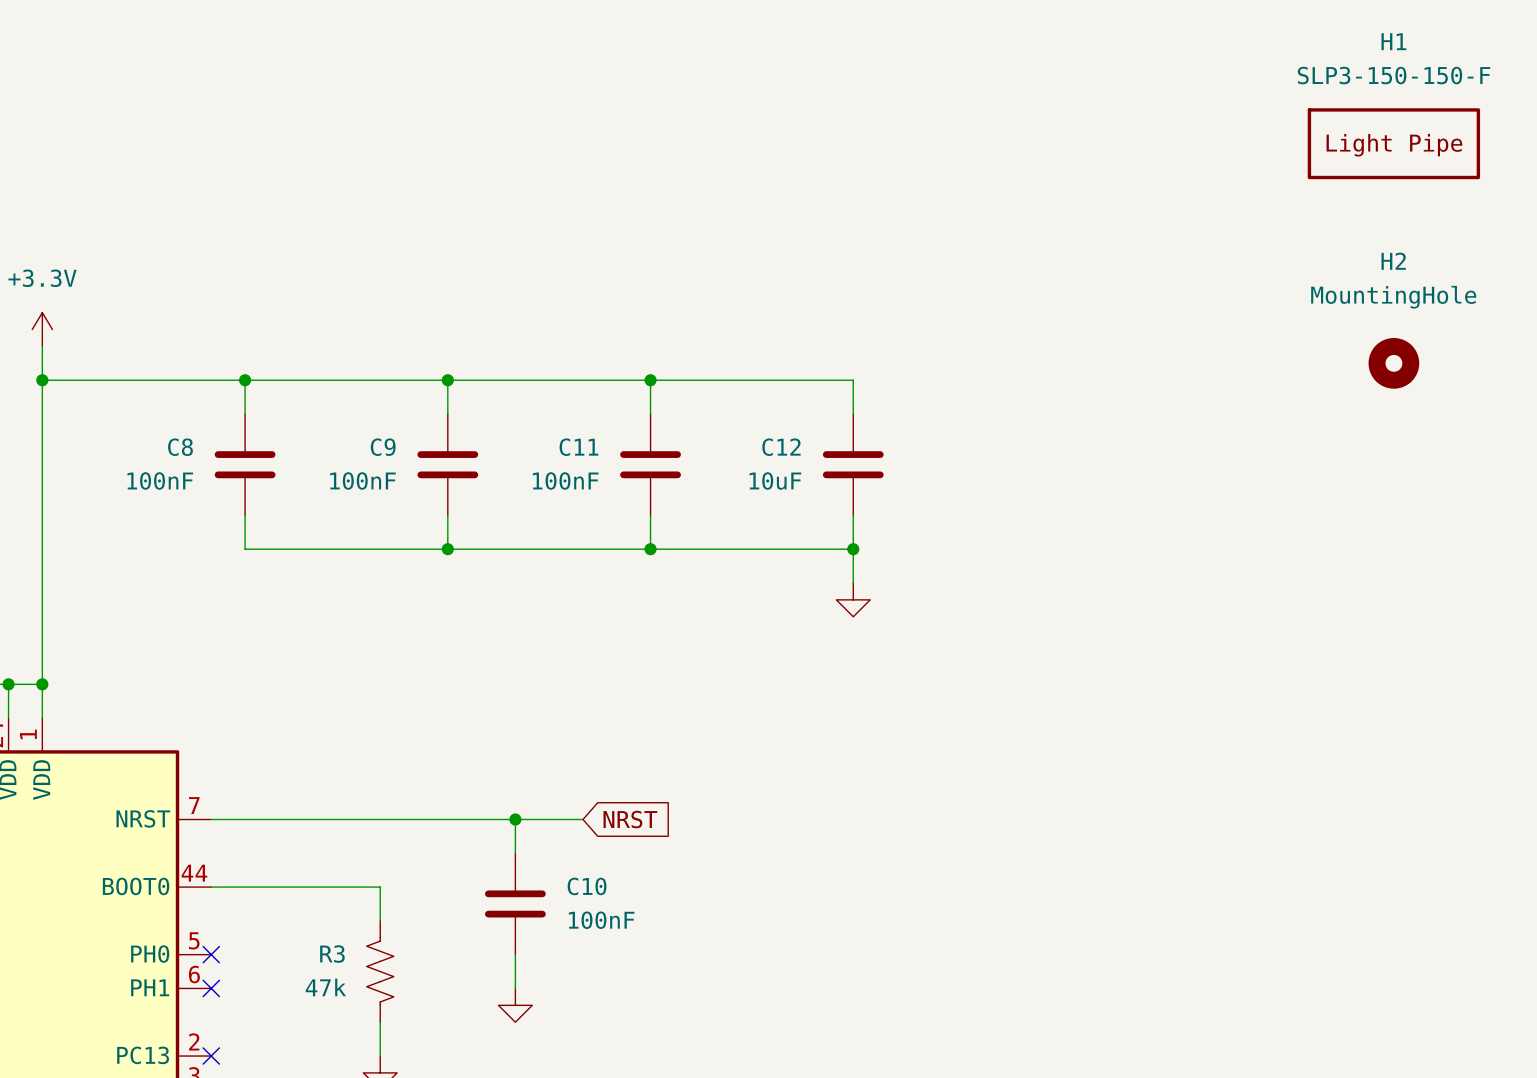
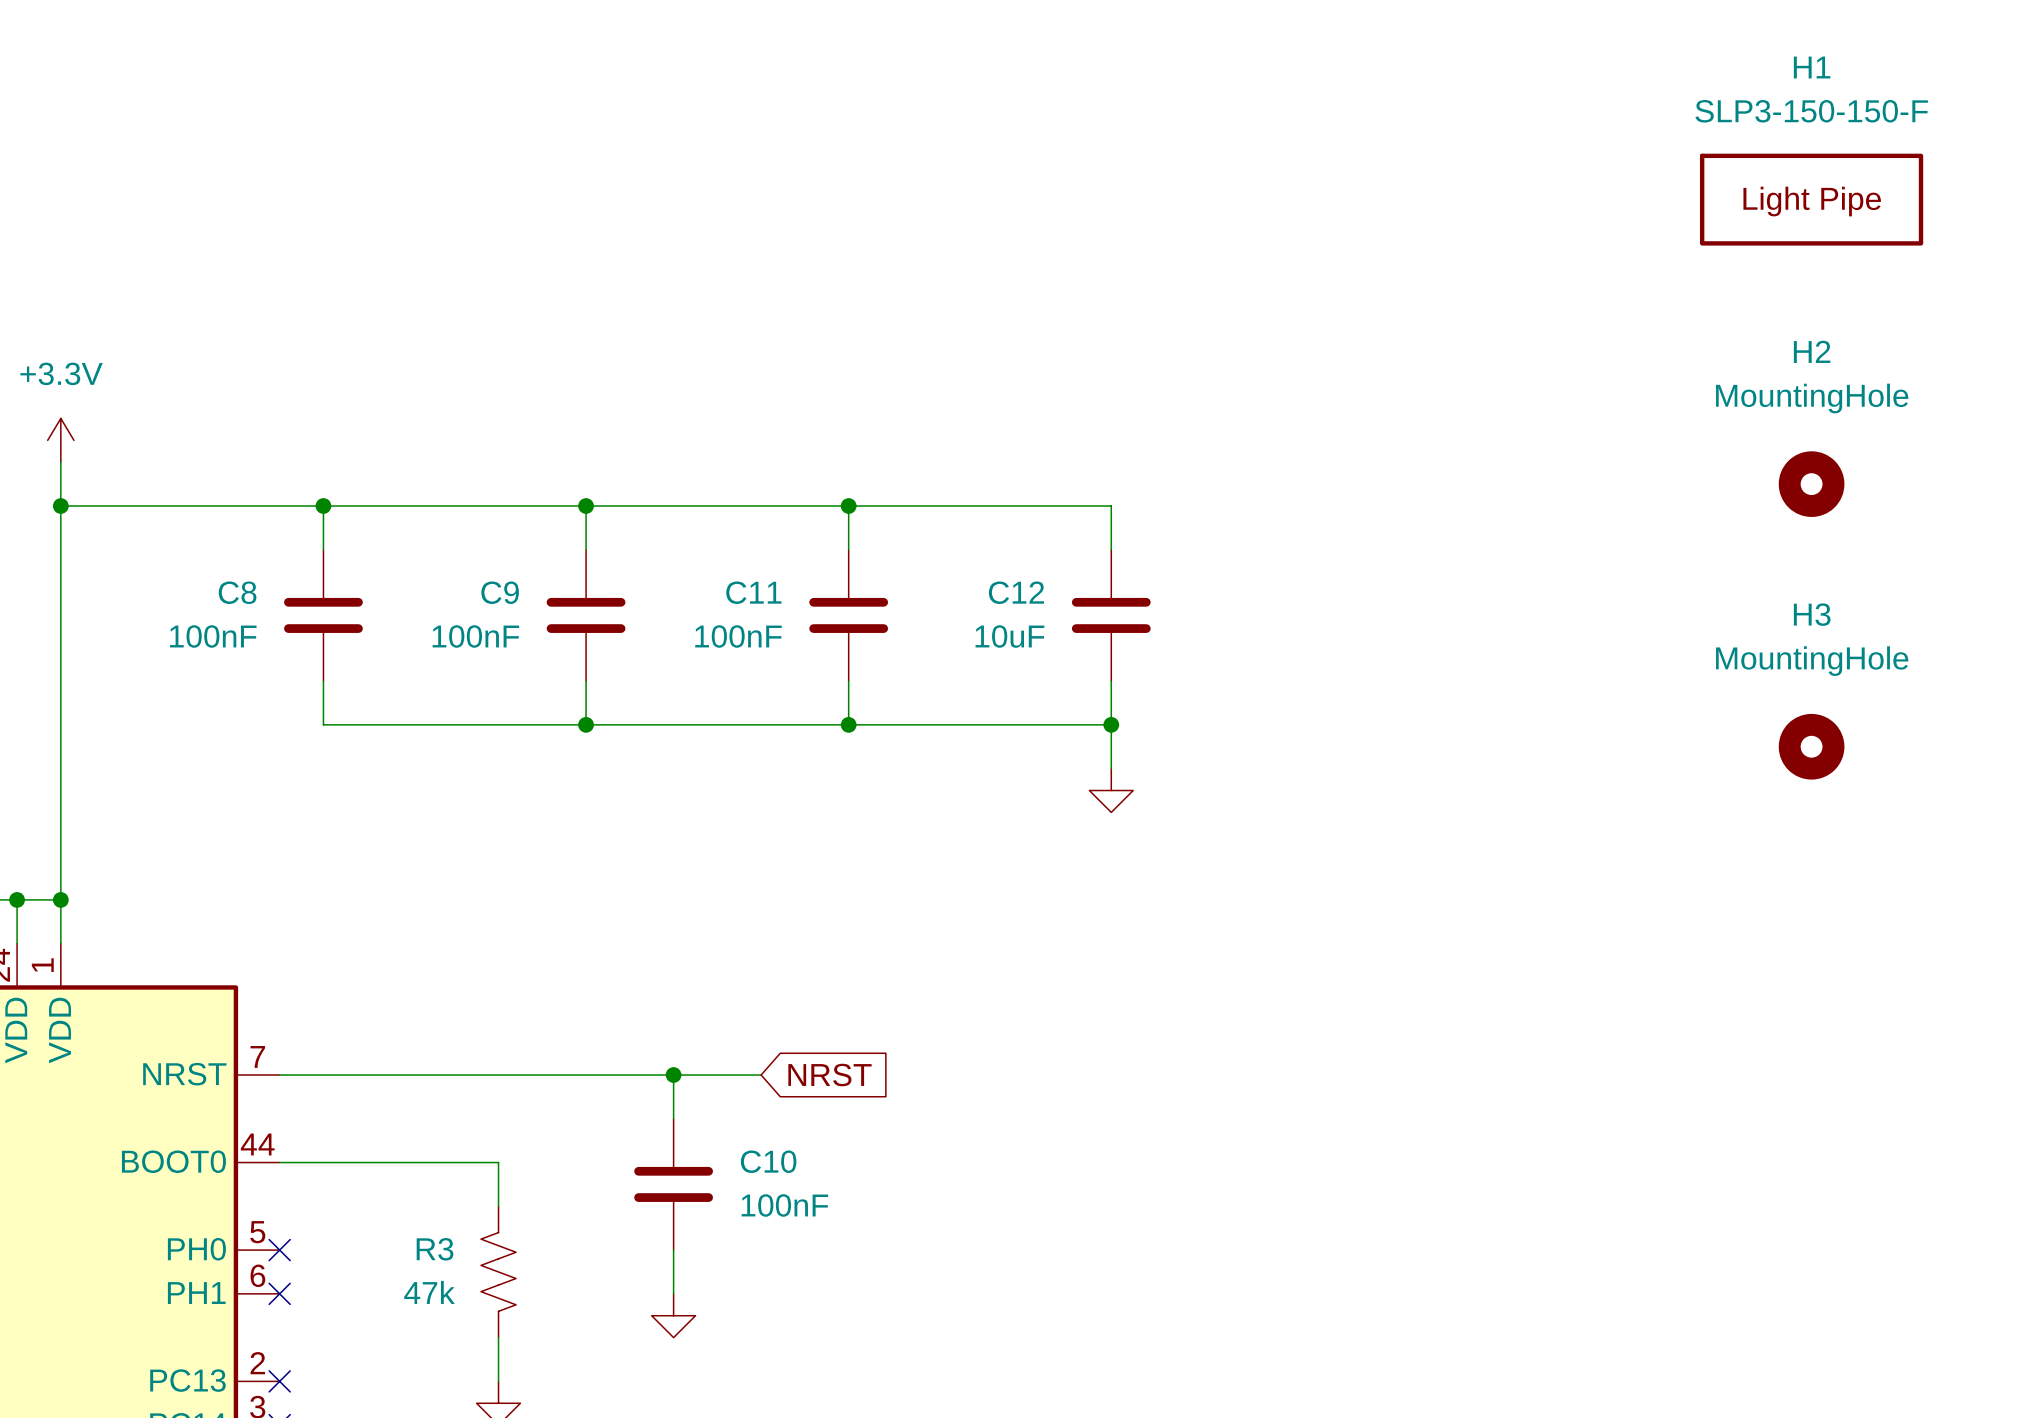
H3: none -> MountingHole (1811, 746)

